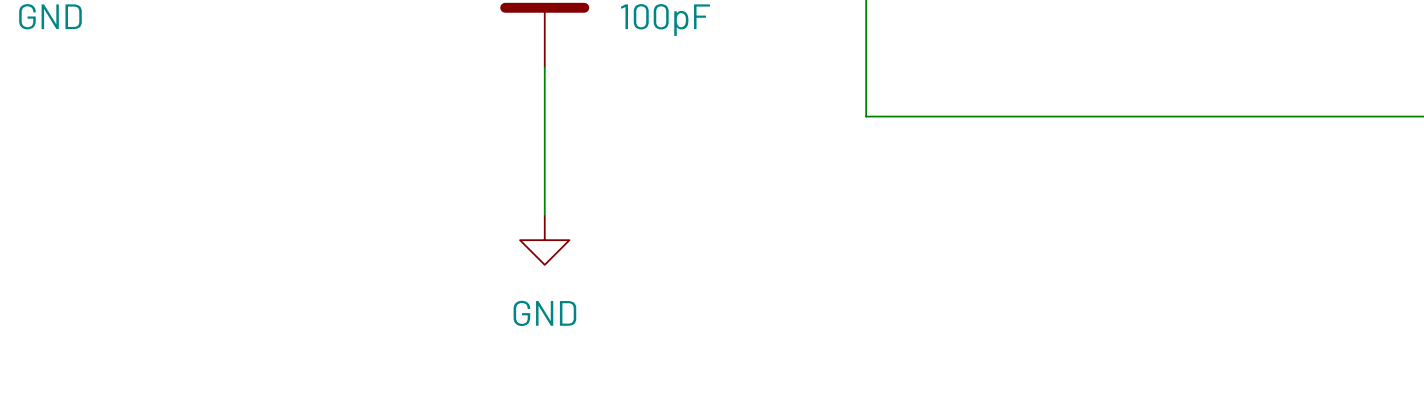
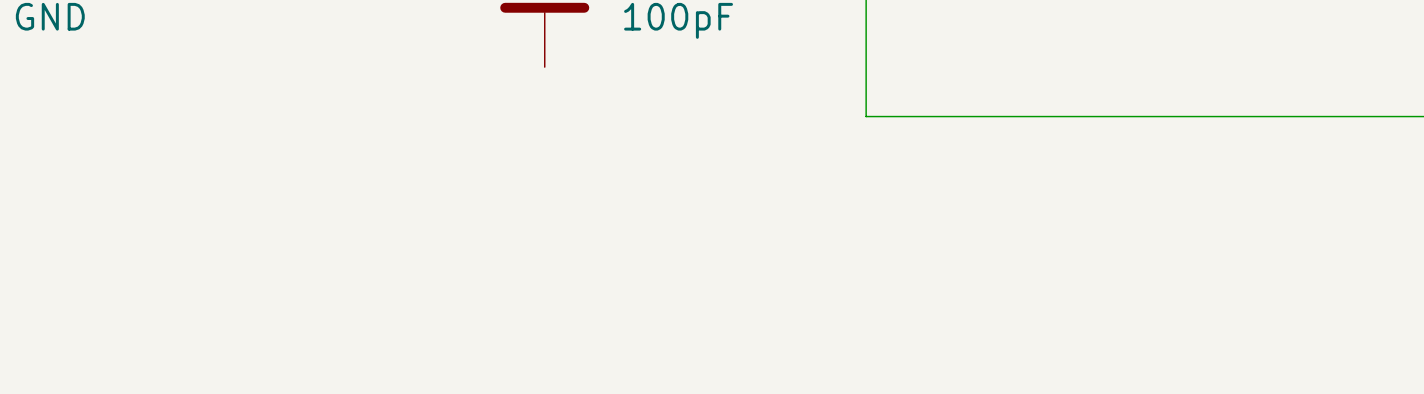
wire: (544, 67) (544, 215) -> none
power symbol: GND (544, 240) -> none

